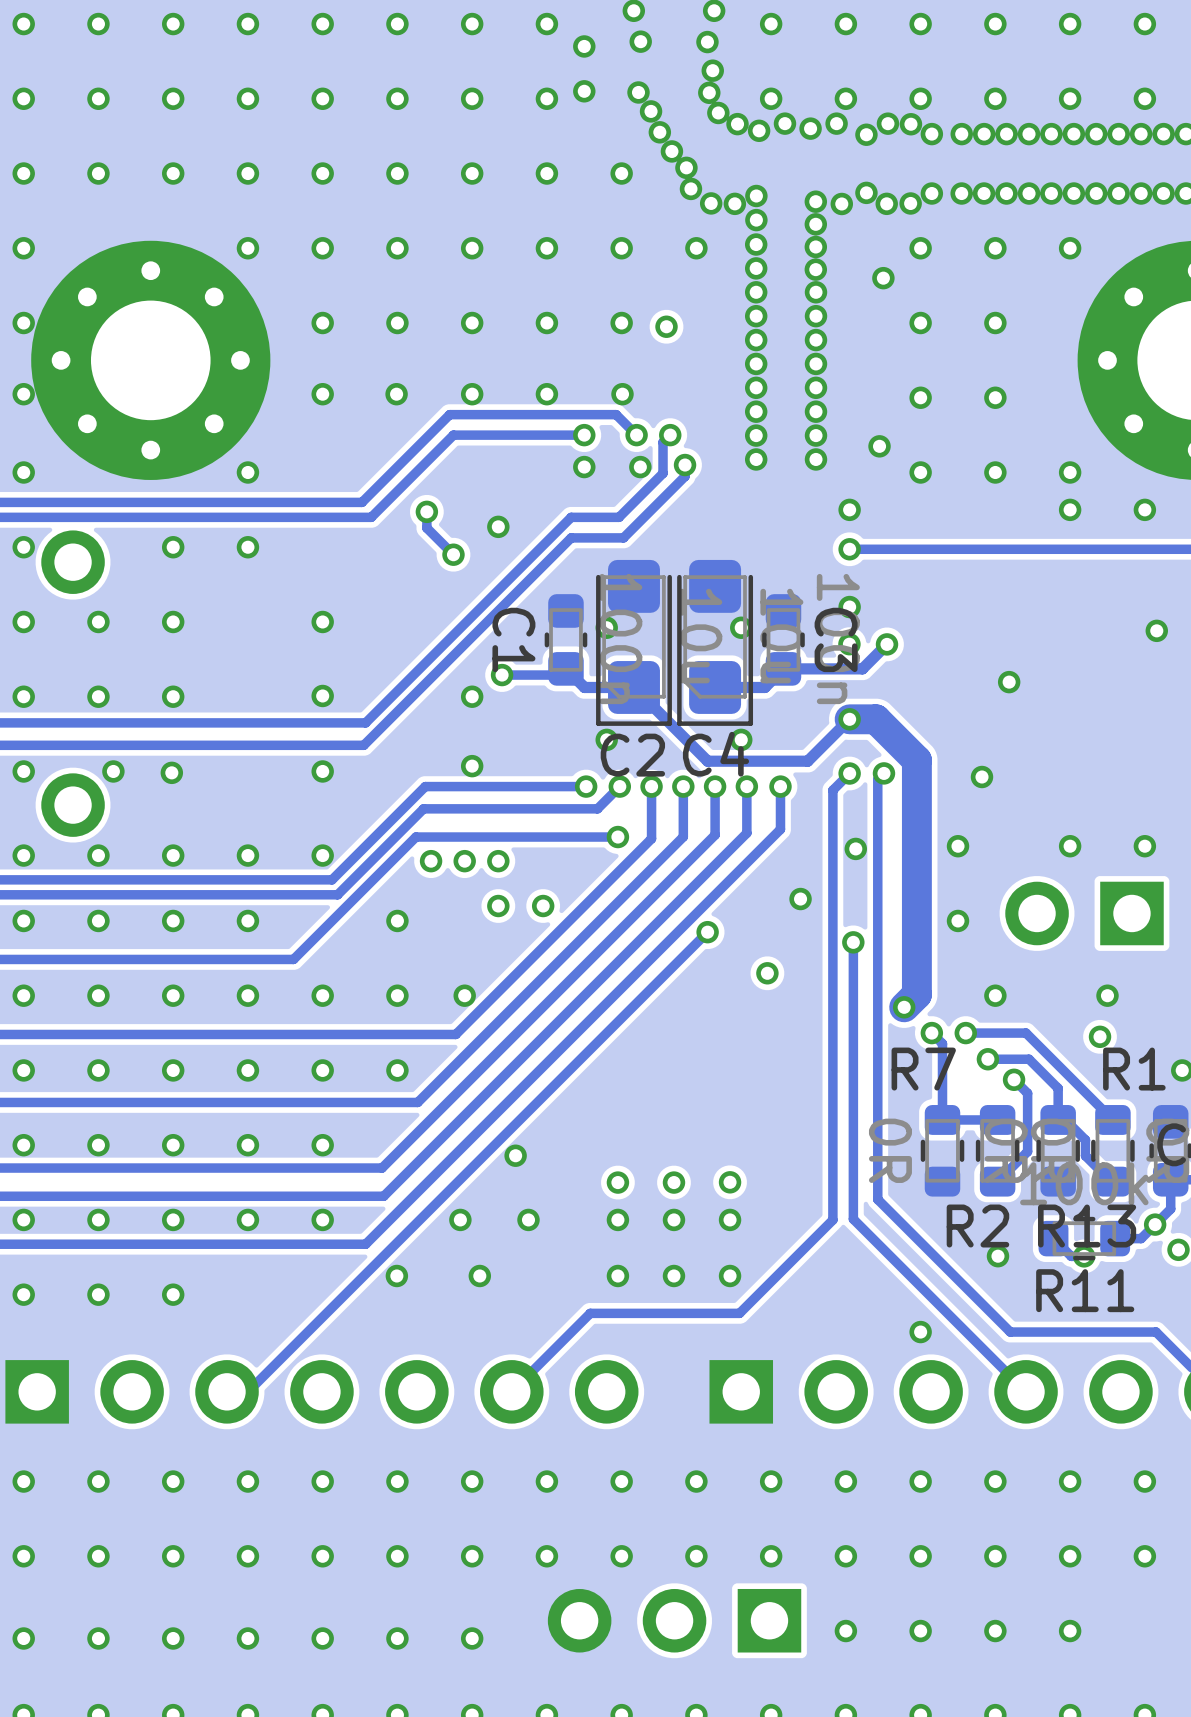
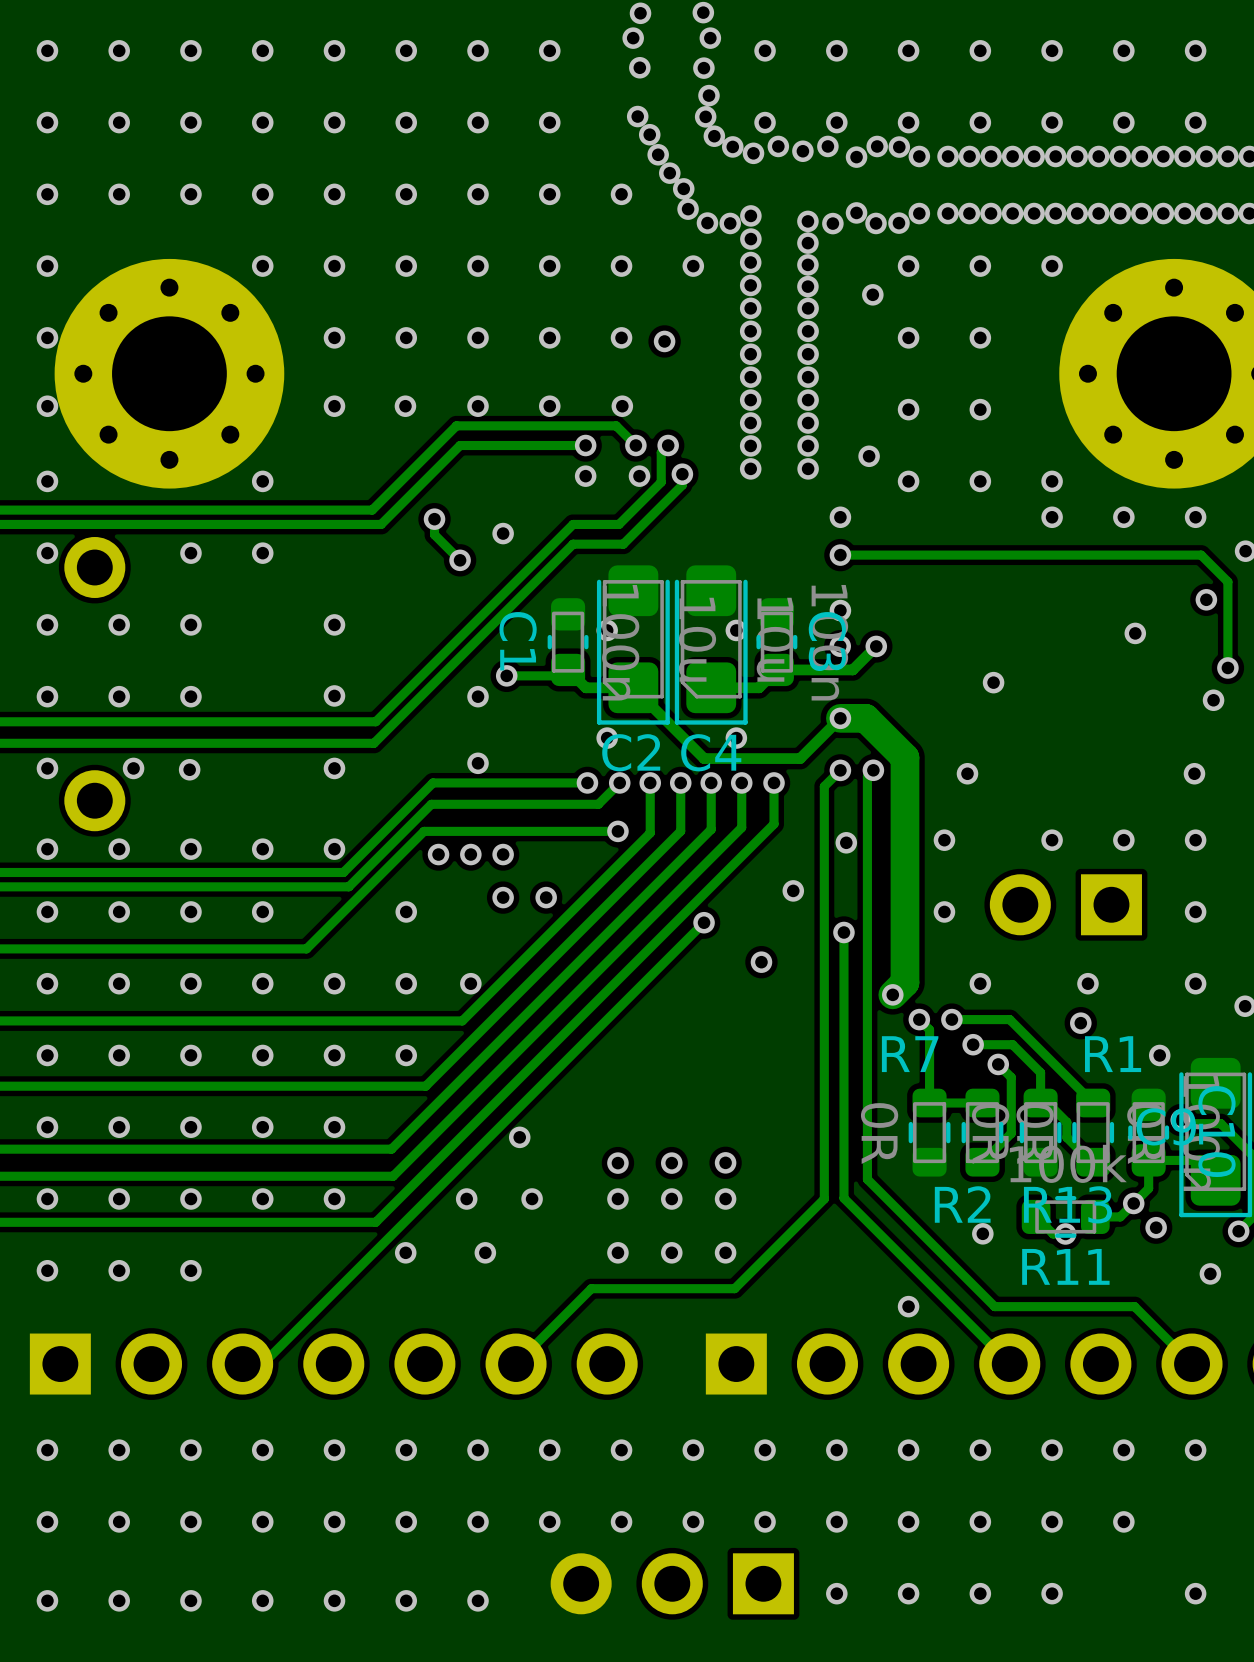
via: (584, 46) -> none
via: (584, 91) -> none

